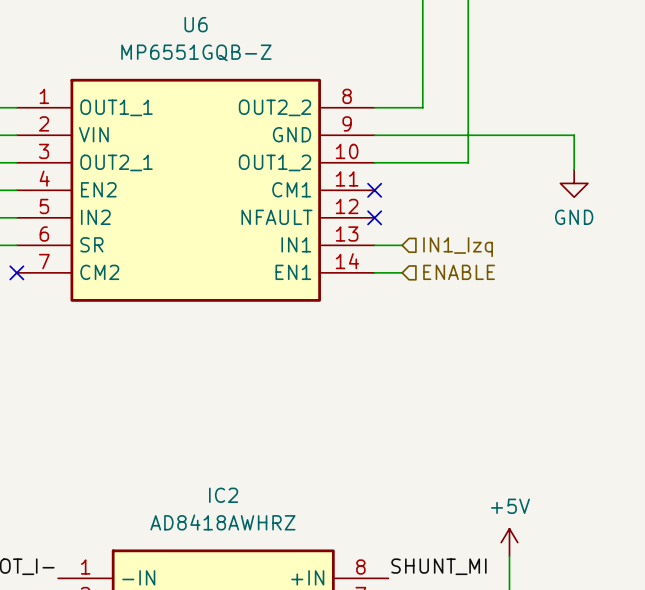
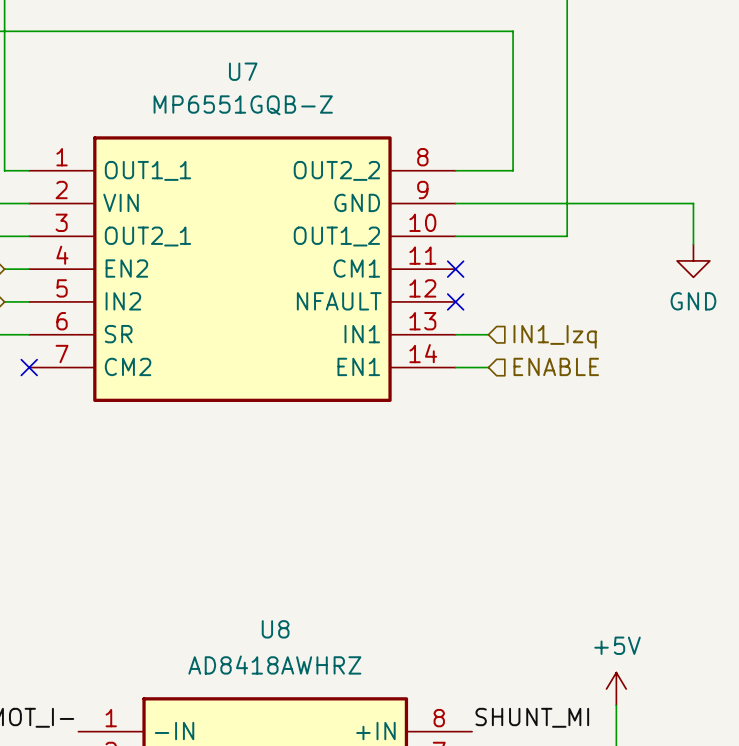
U6 name: U6 (196, 24) -> U7 (243, 71)
IC2 name: IC2 (223, 495) -> U8 (275, 629)

